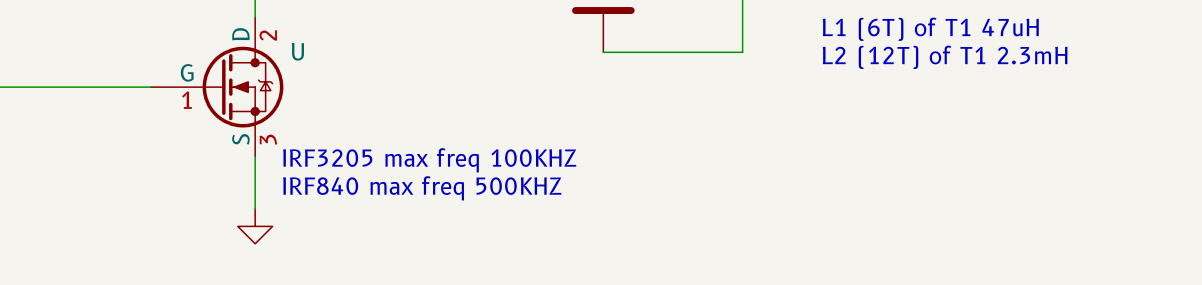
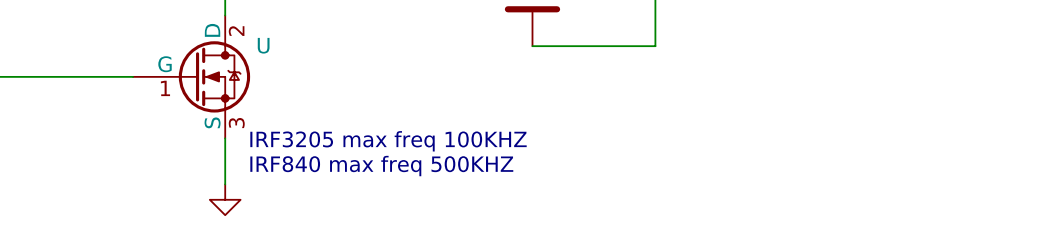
text: L1 (6T) of T1 47uH (930, 29) -> none
text: L2 (12T) of T1 2.3mH (945, 57) -> none

